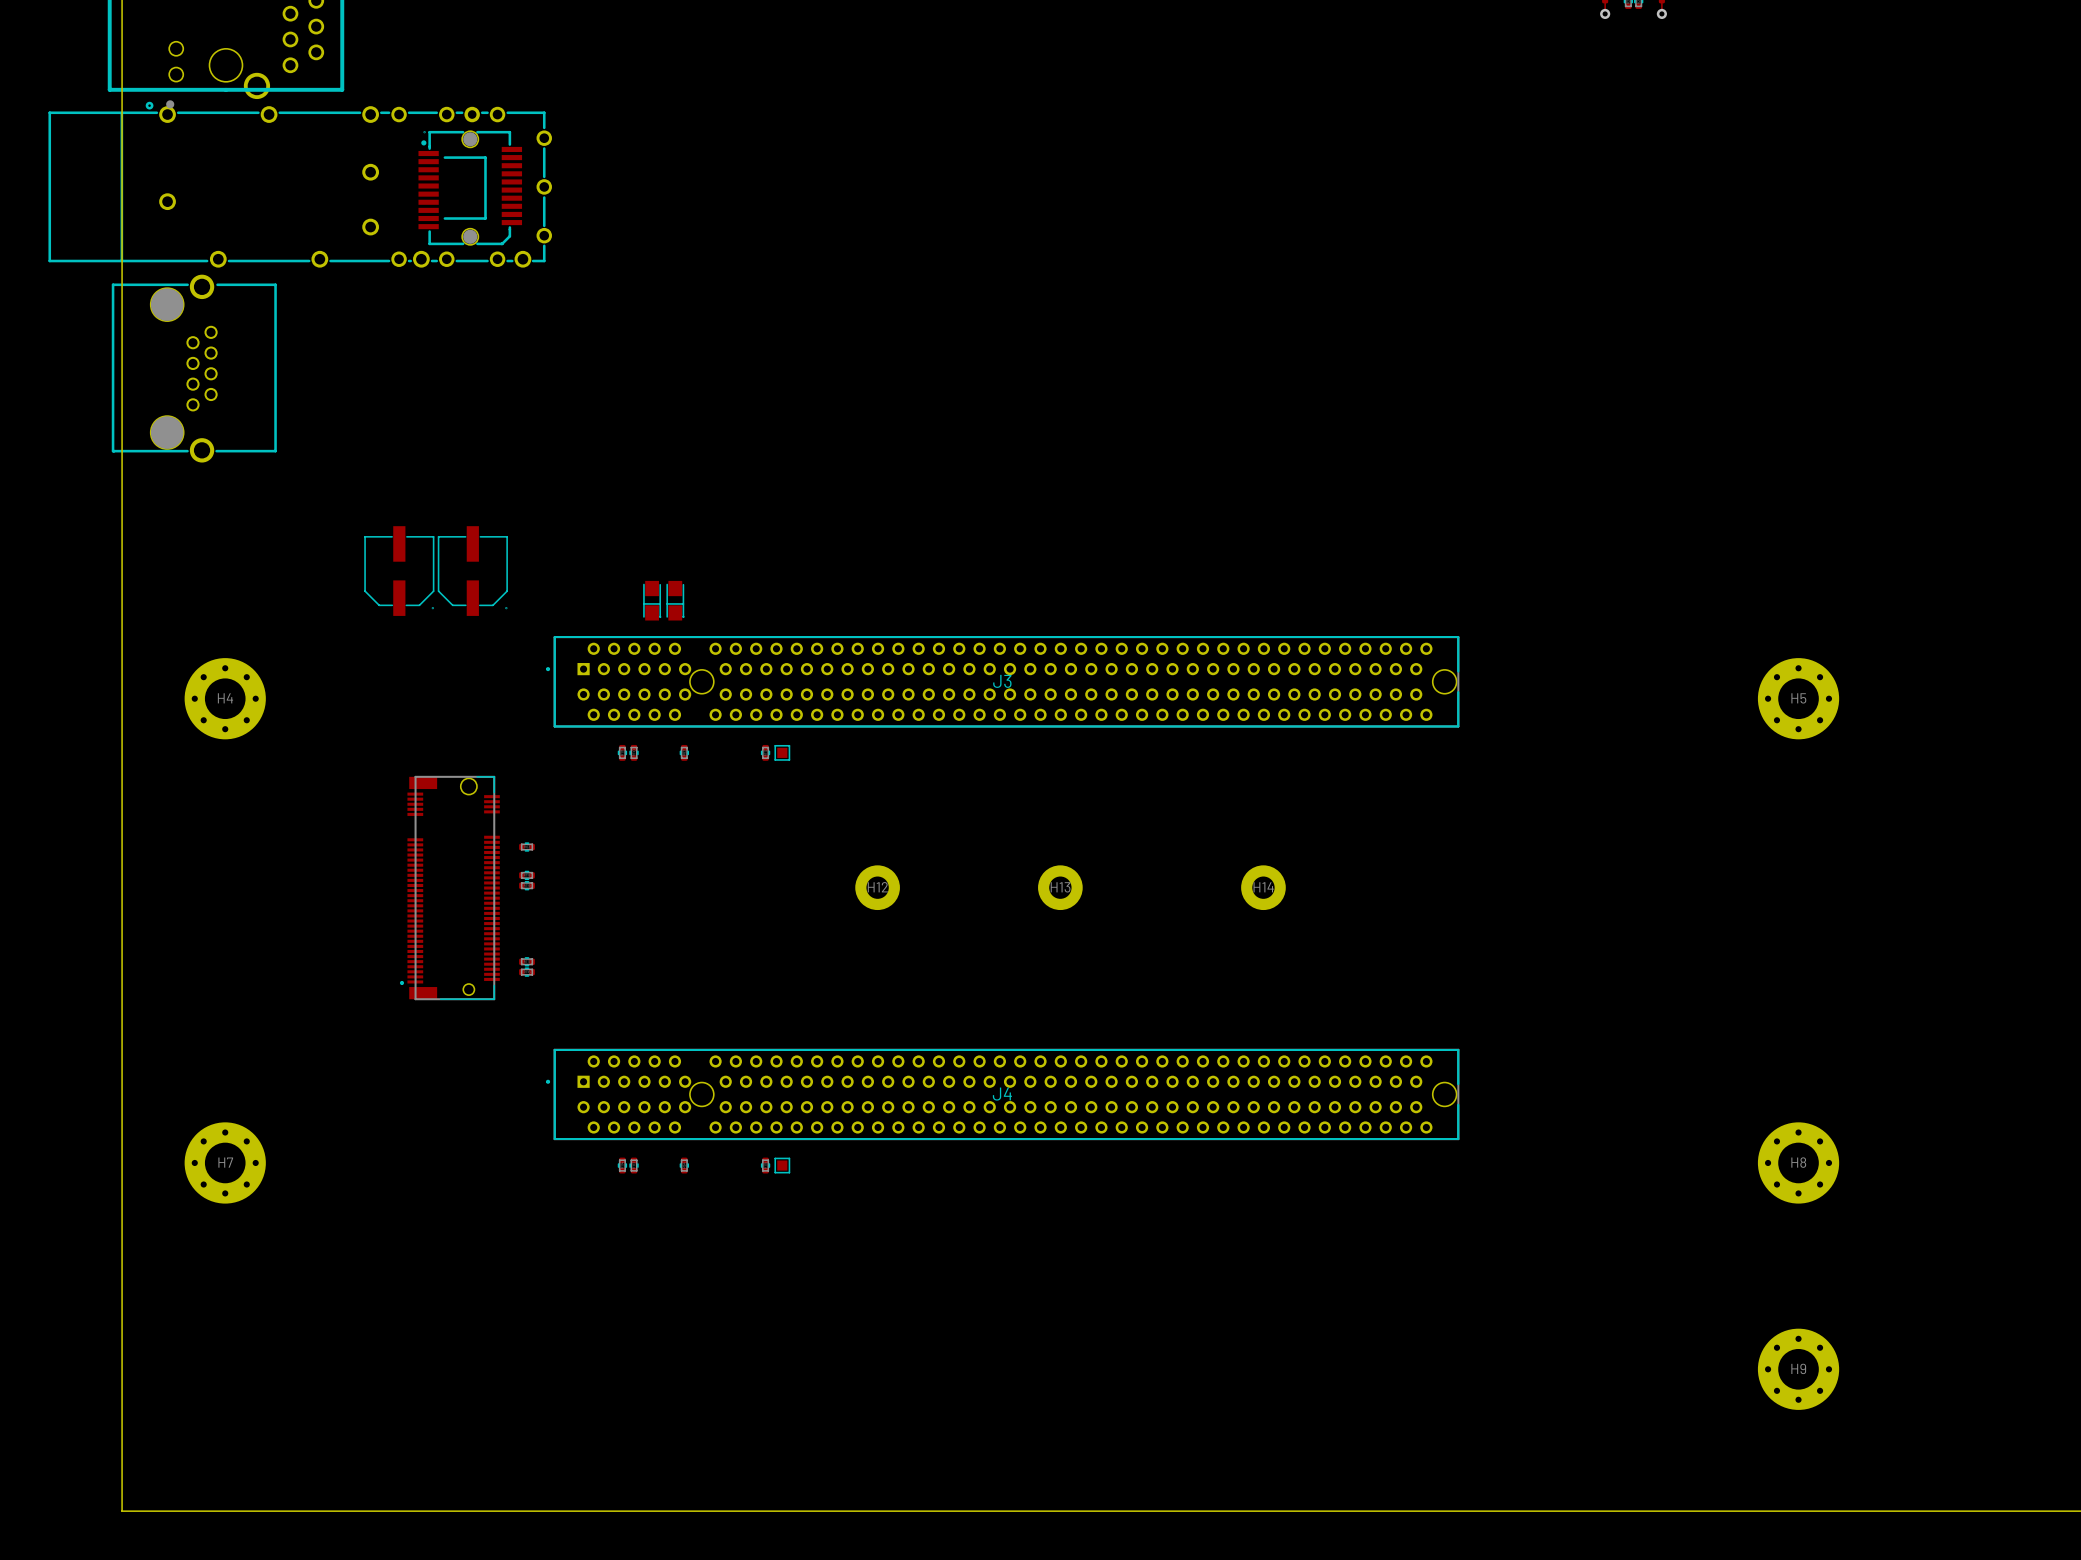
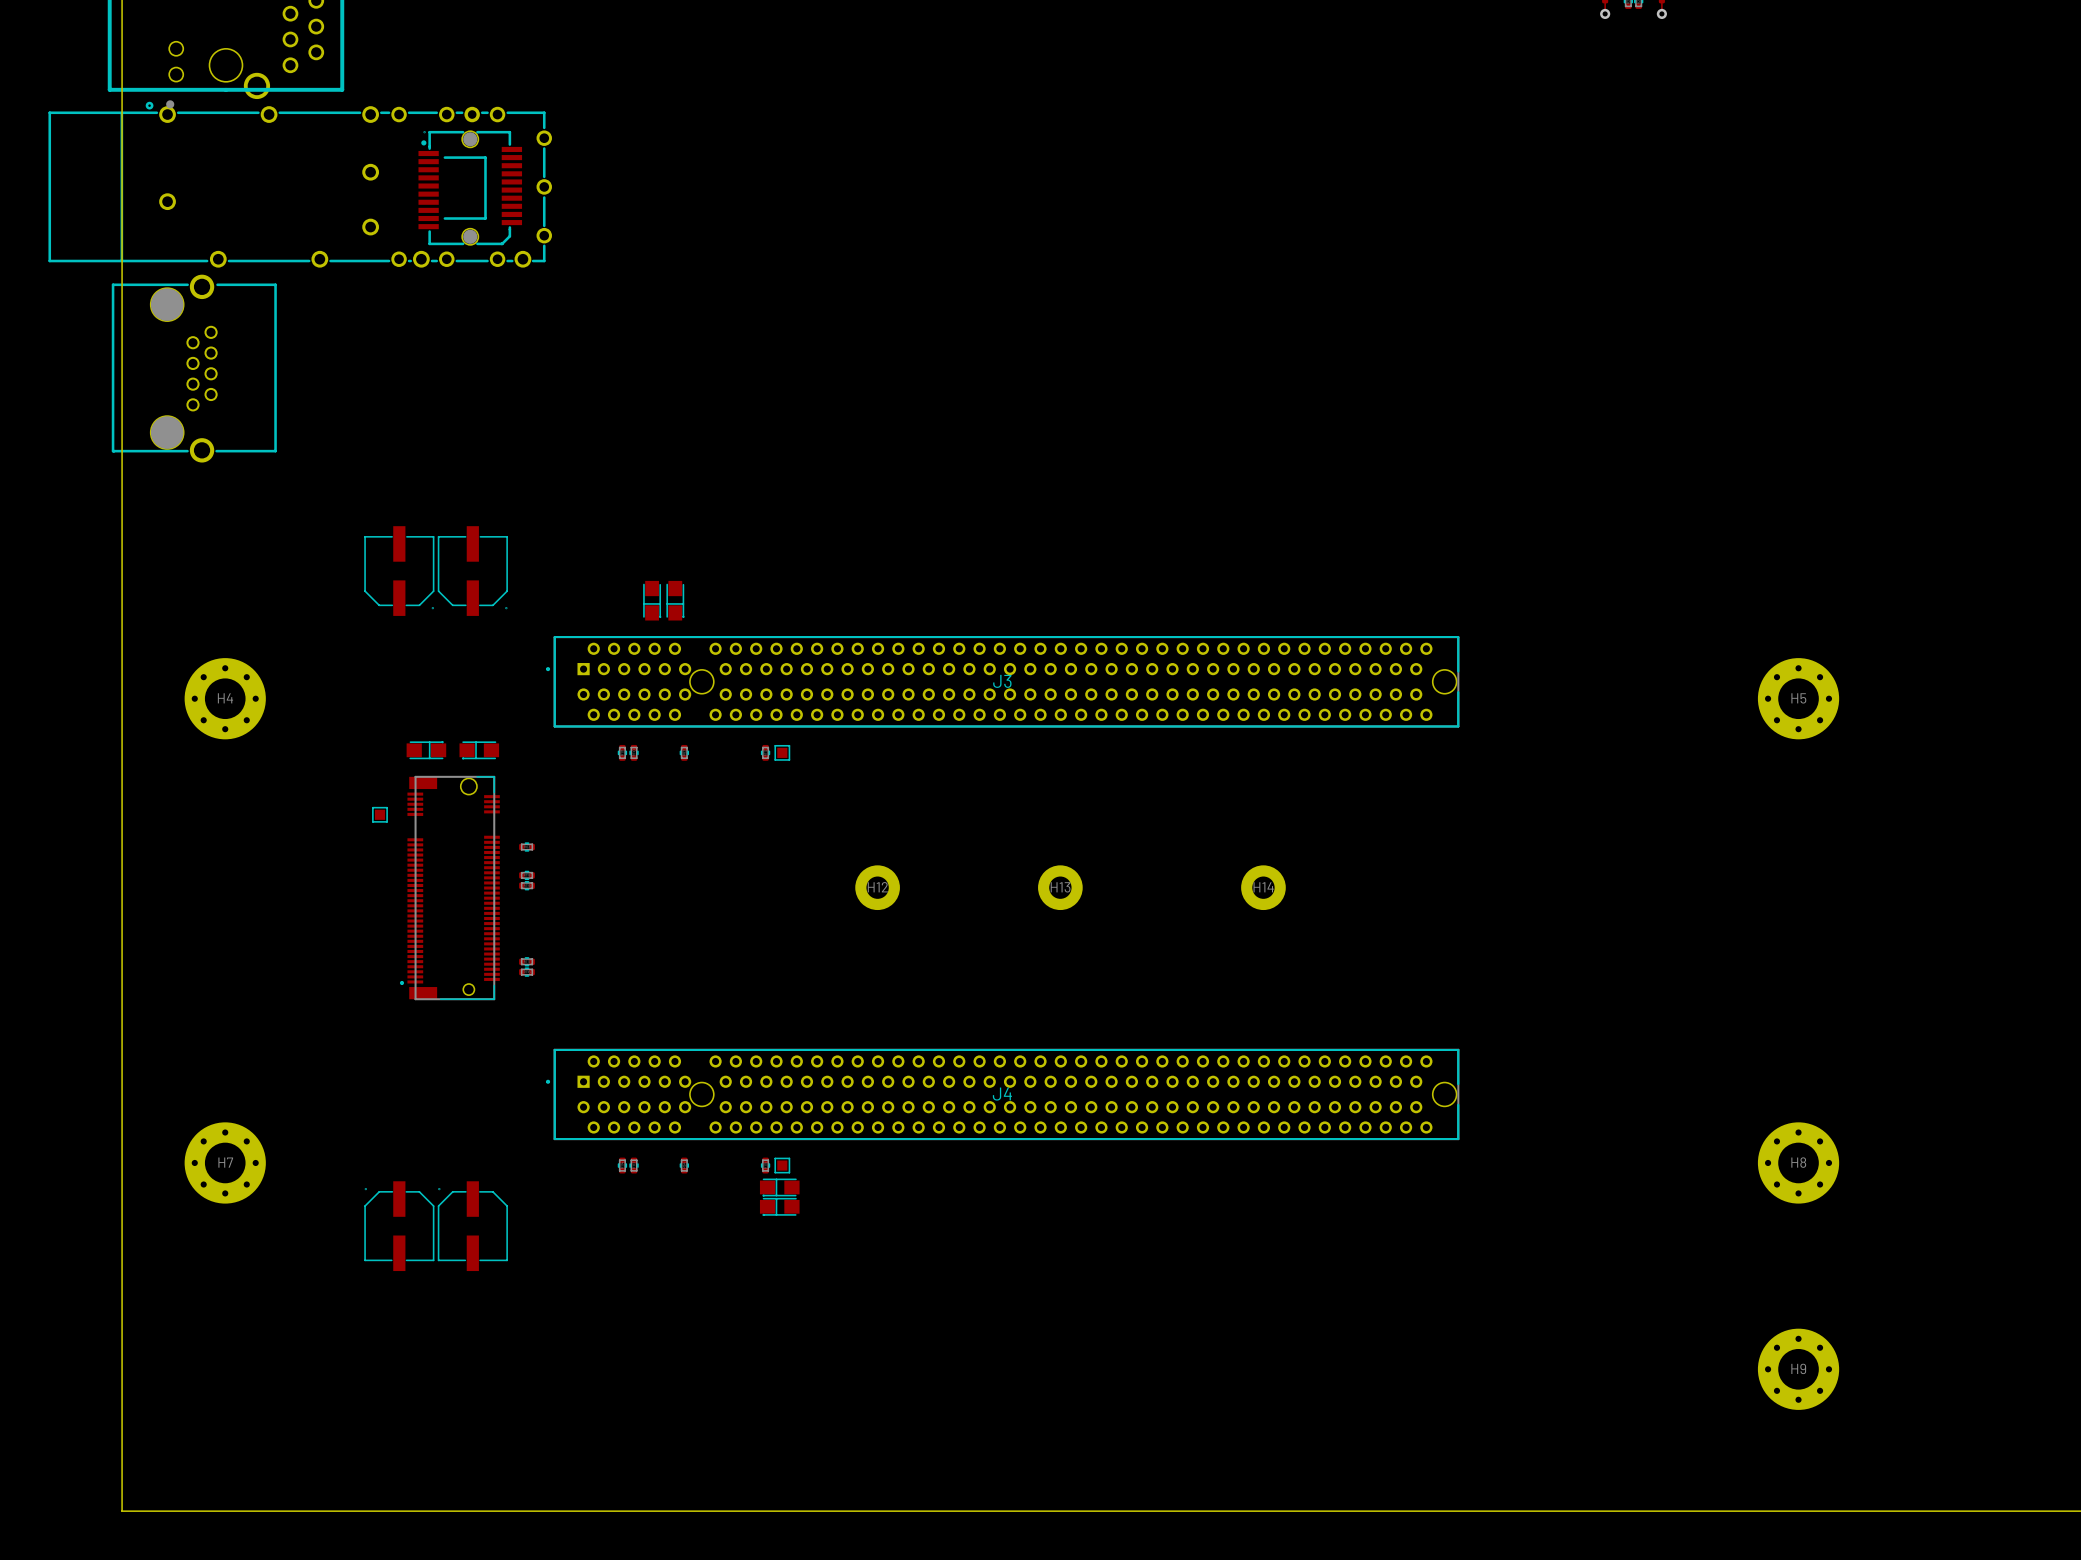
part: none -> (426, 750)
part: none -> (479, 750)
part: none -> (379, 814)
part: none -> (779, 1187)
part: none -> (779, 1206)
part: none -> (399, 1226)
part: none -> (472, 1226)

